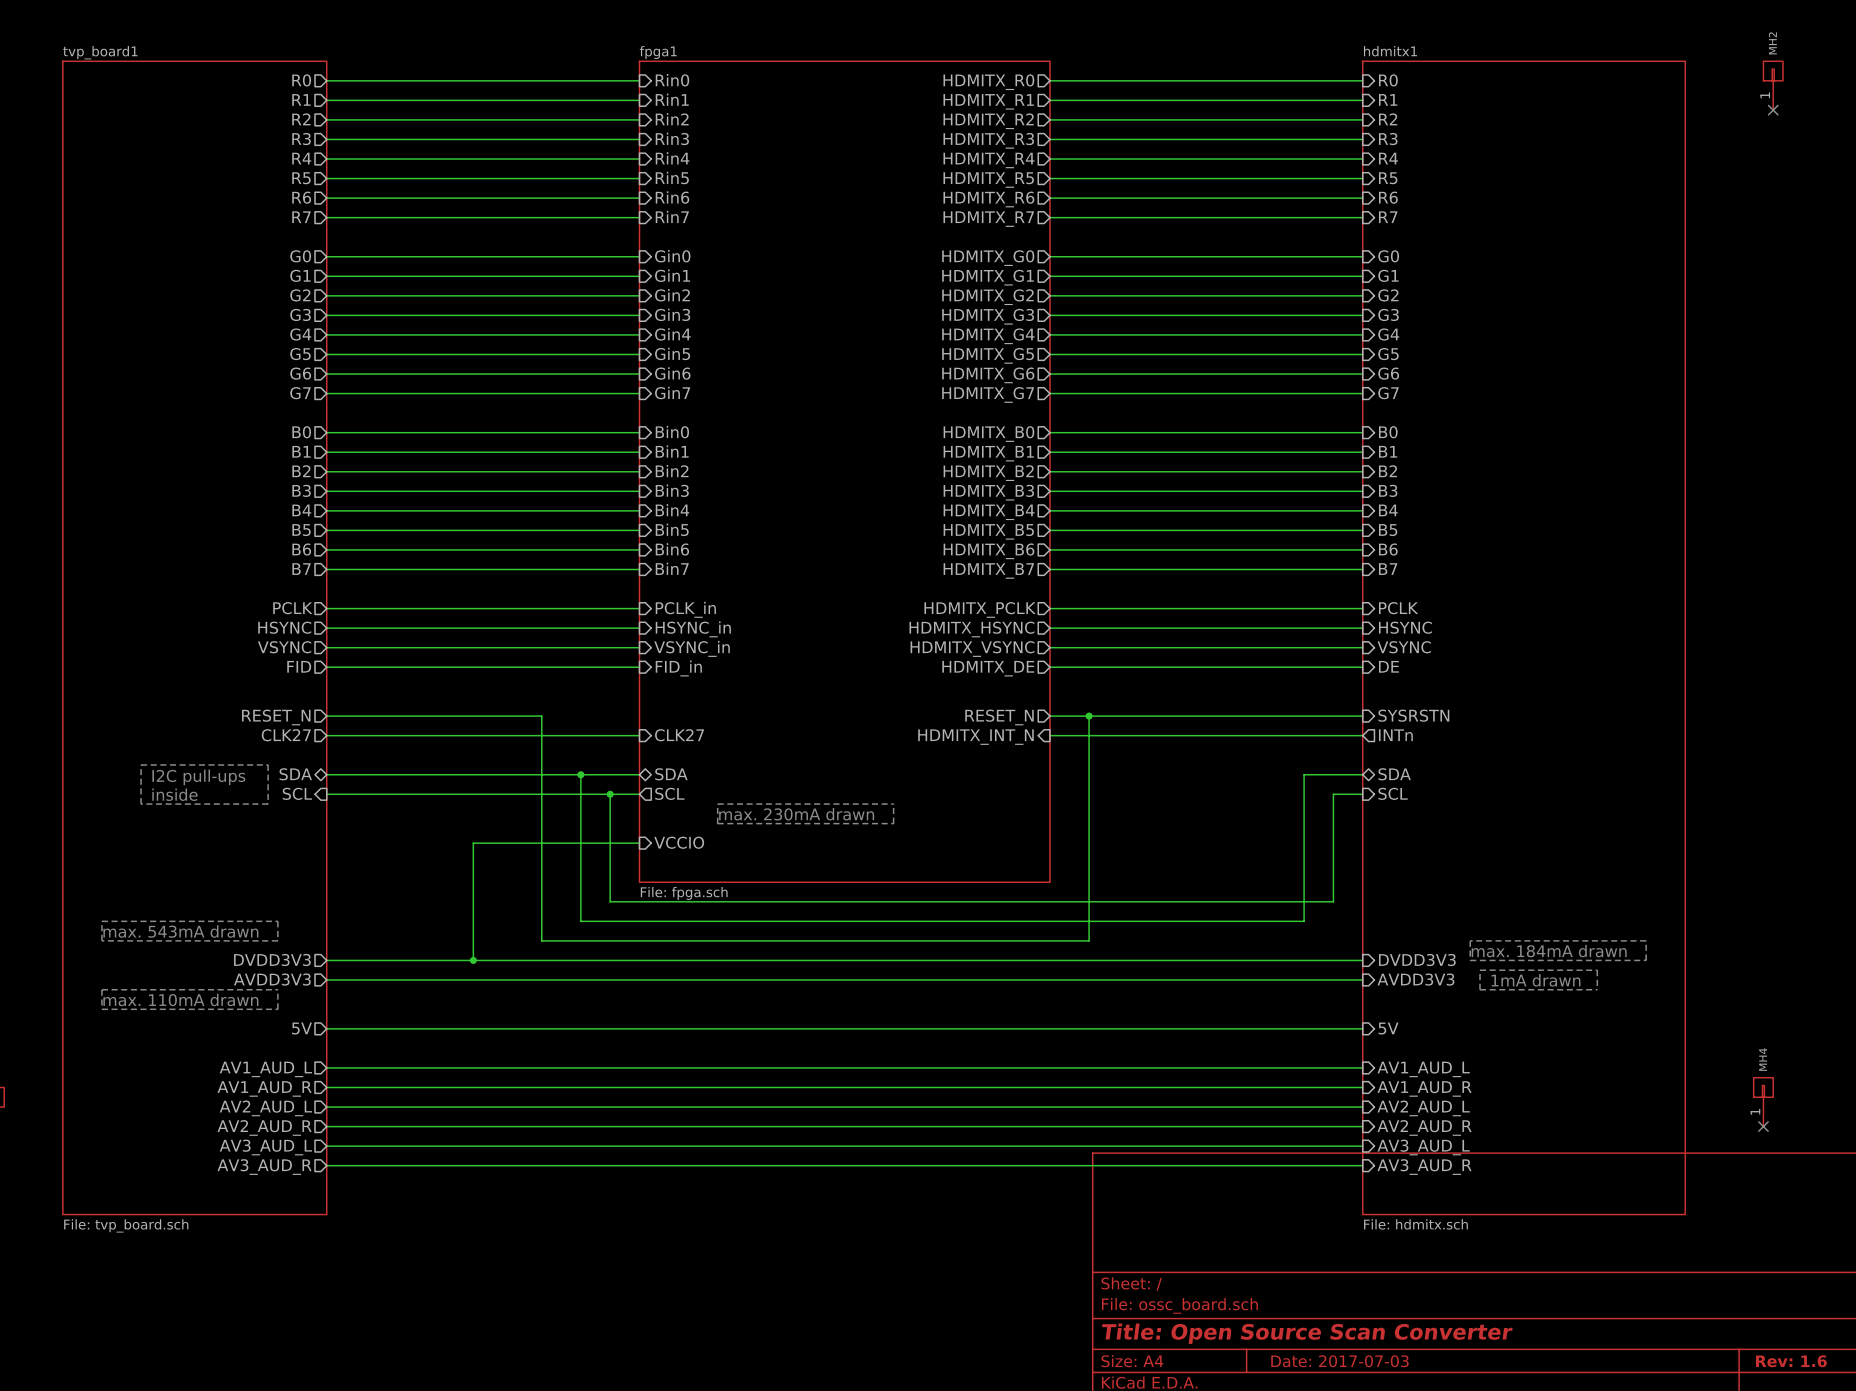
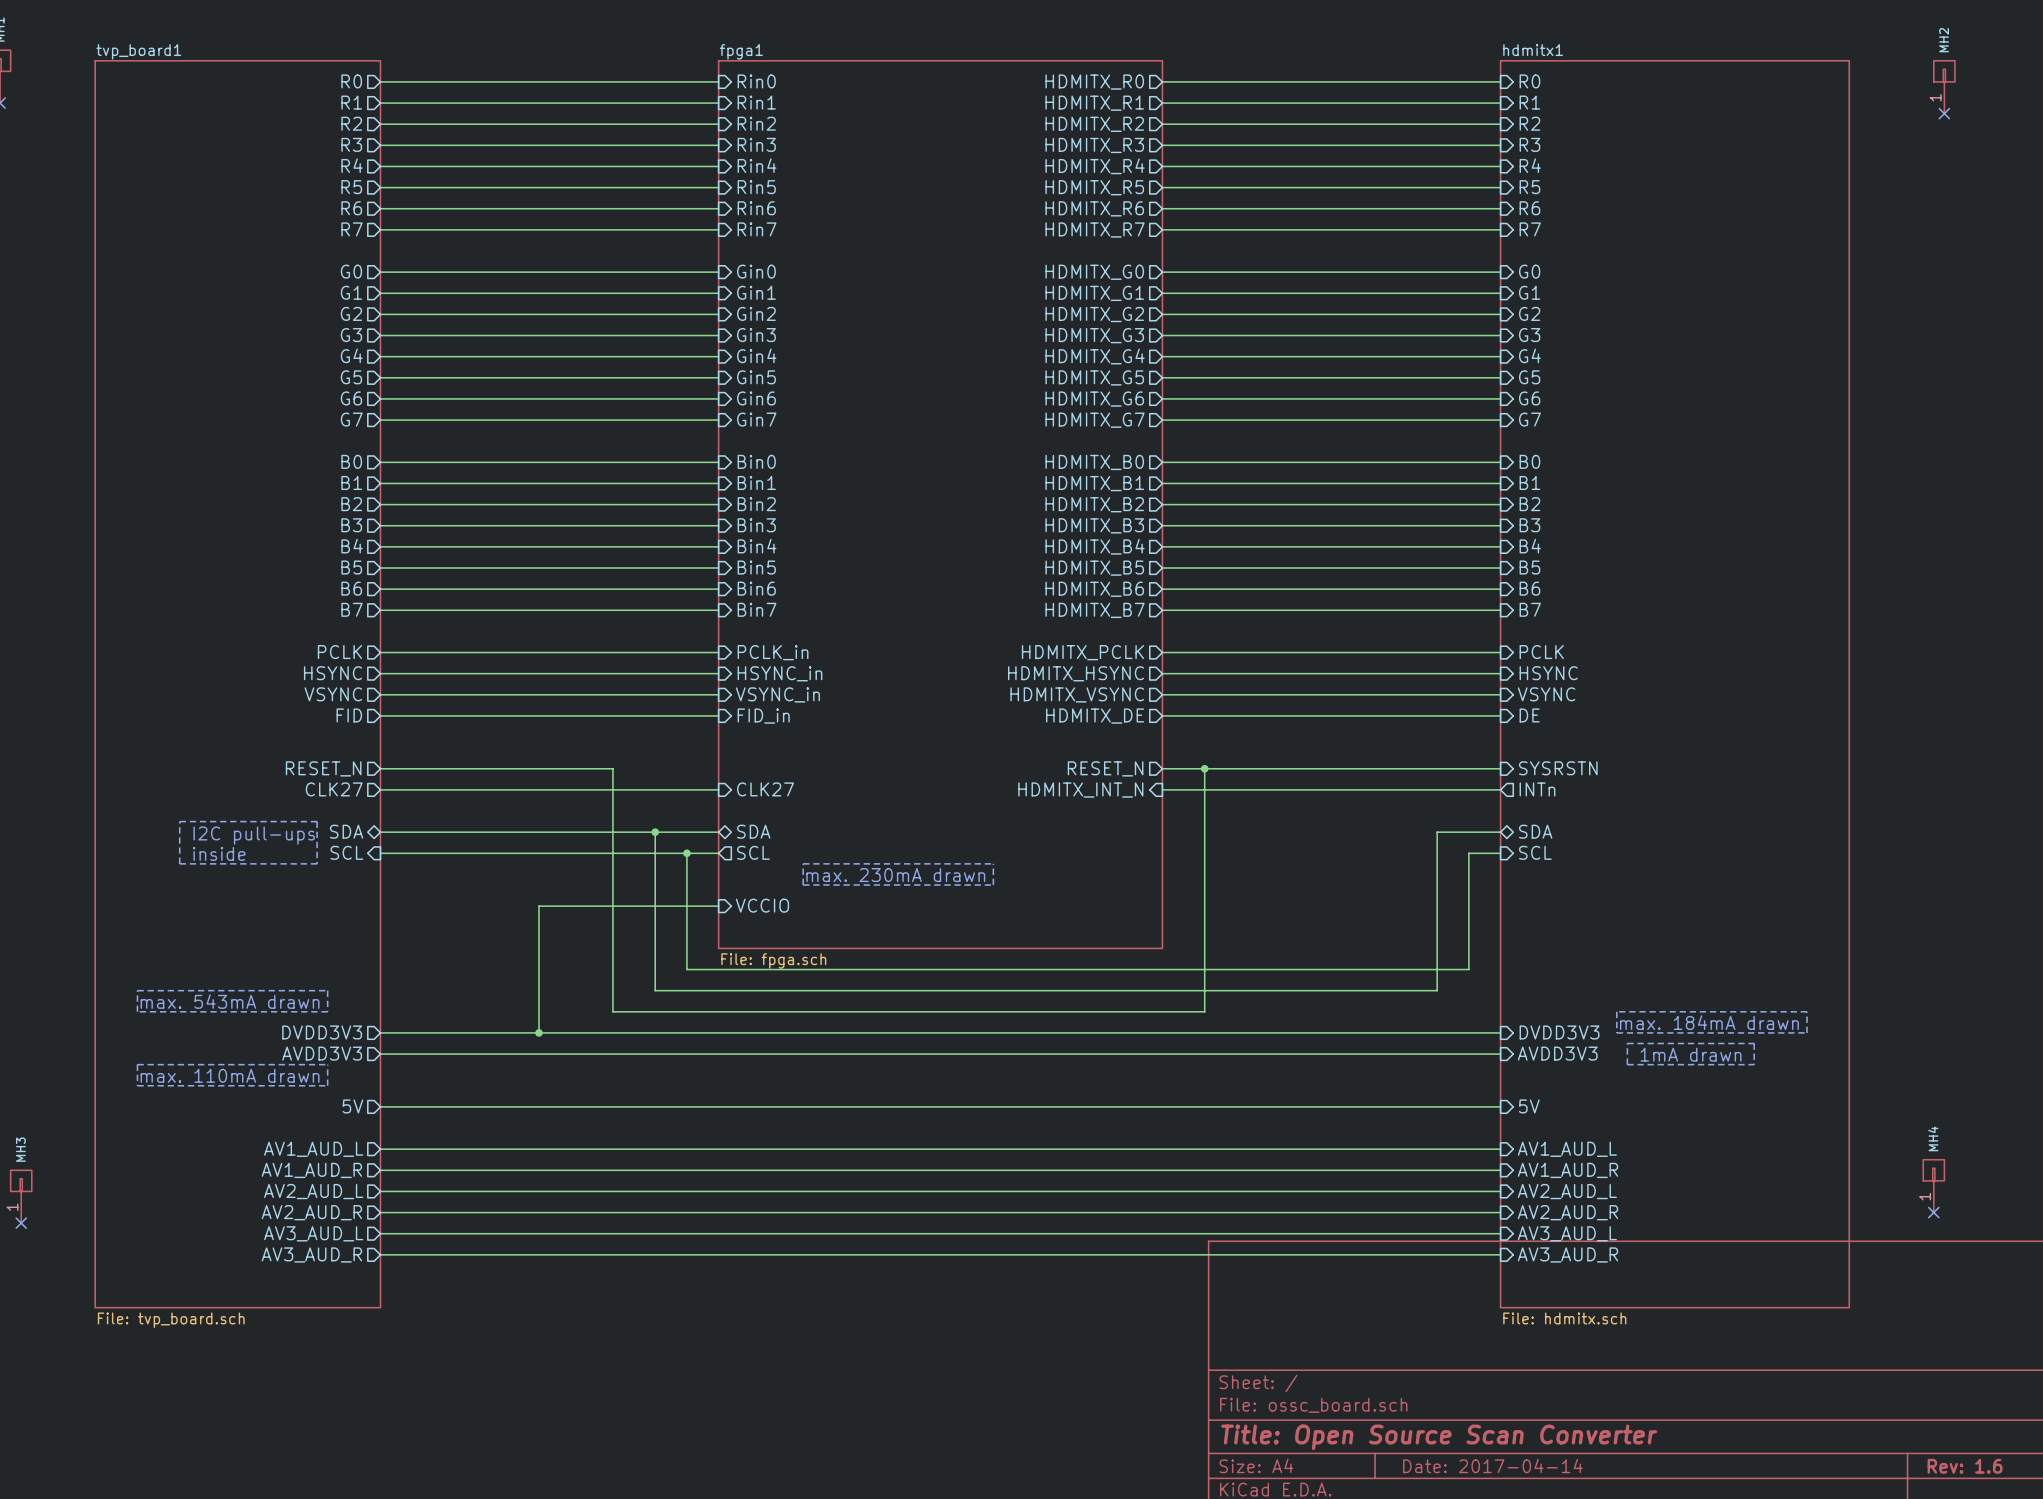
title block: Date: 2017-07-03 (1339, 1361) -> Date: 2017-04-14 (1492, 1465)

